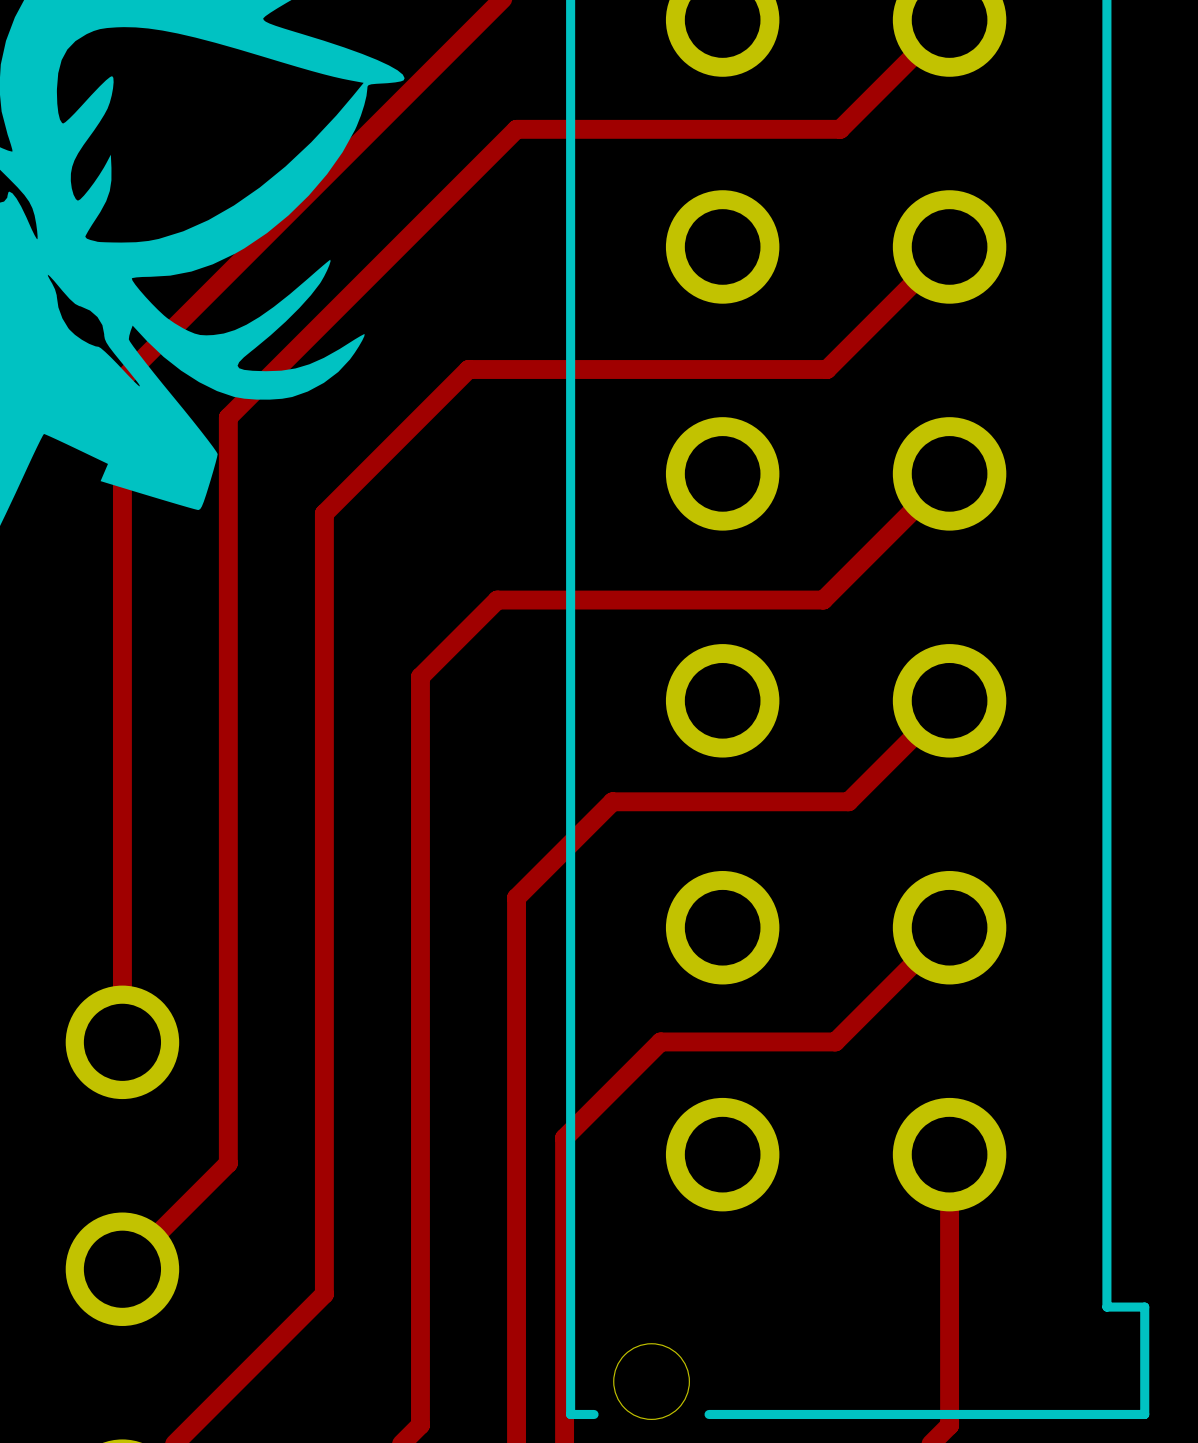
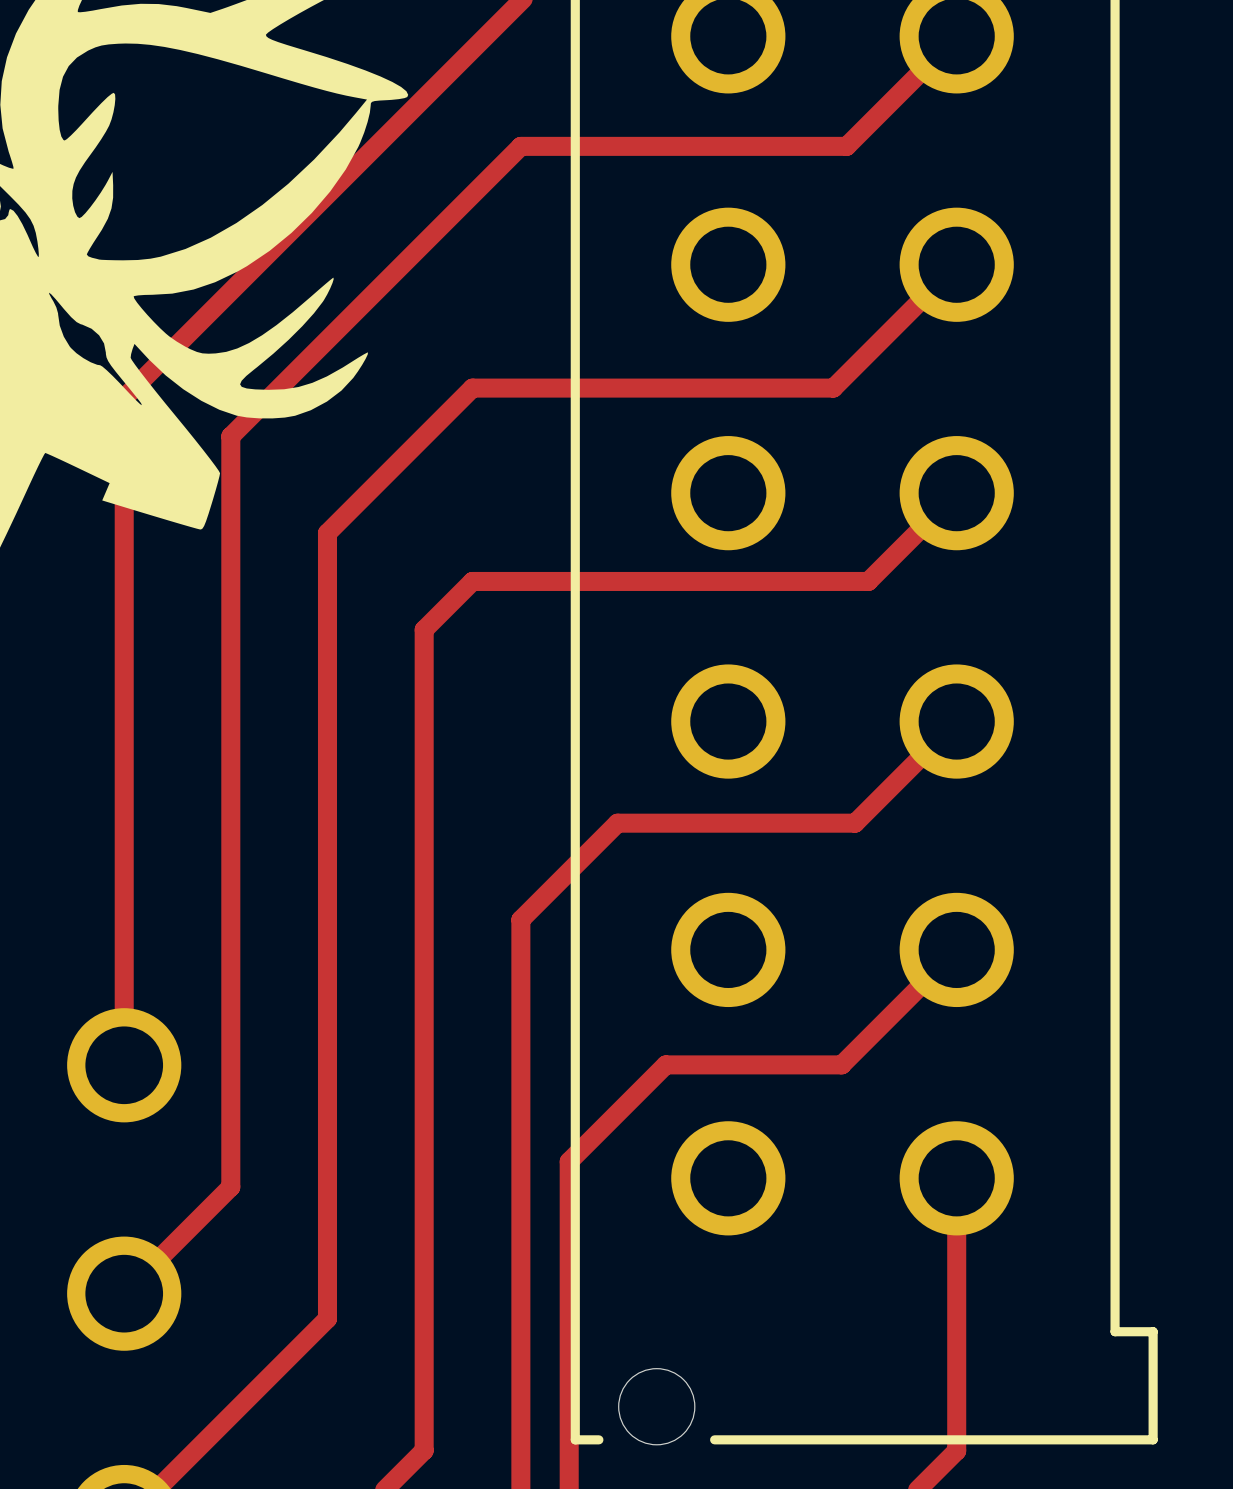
track: (861, 561) (823, 600) (497, 600) (420, 676) -> (868, 581) (472, 581) (424, 629) (424, 697)

